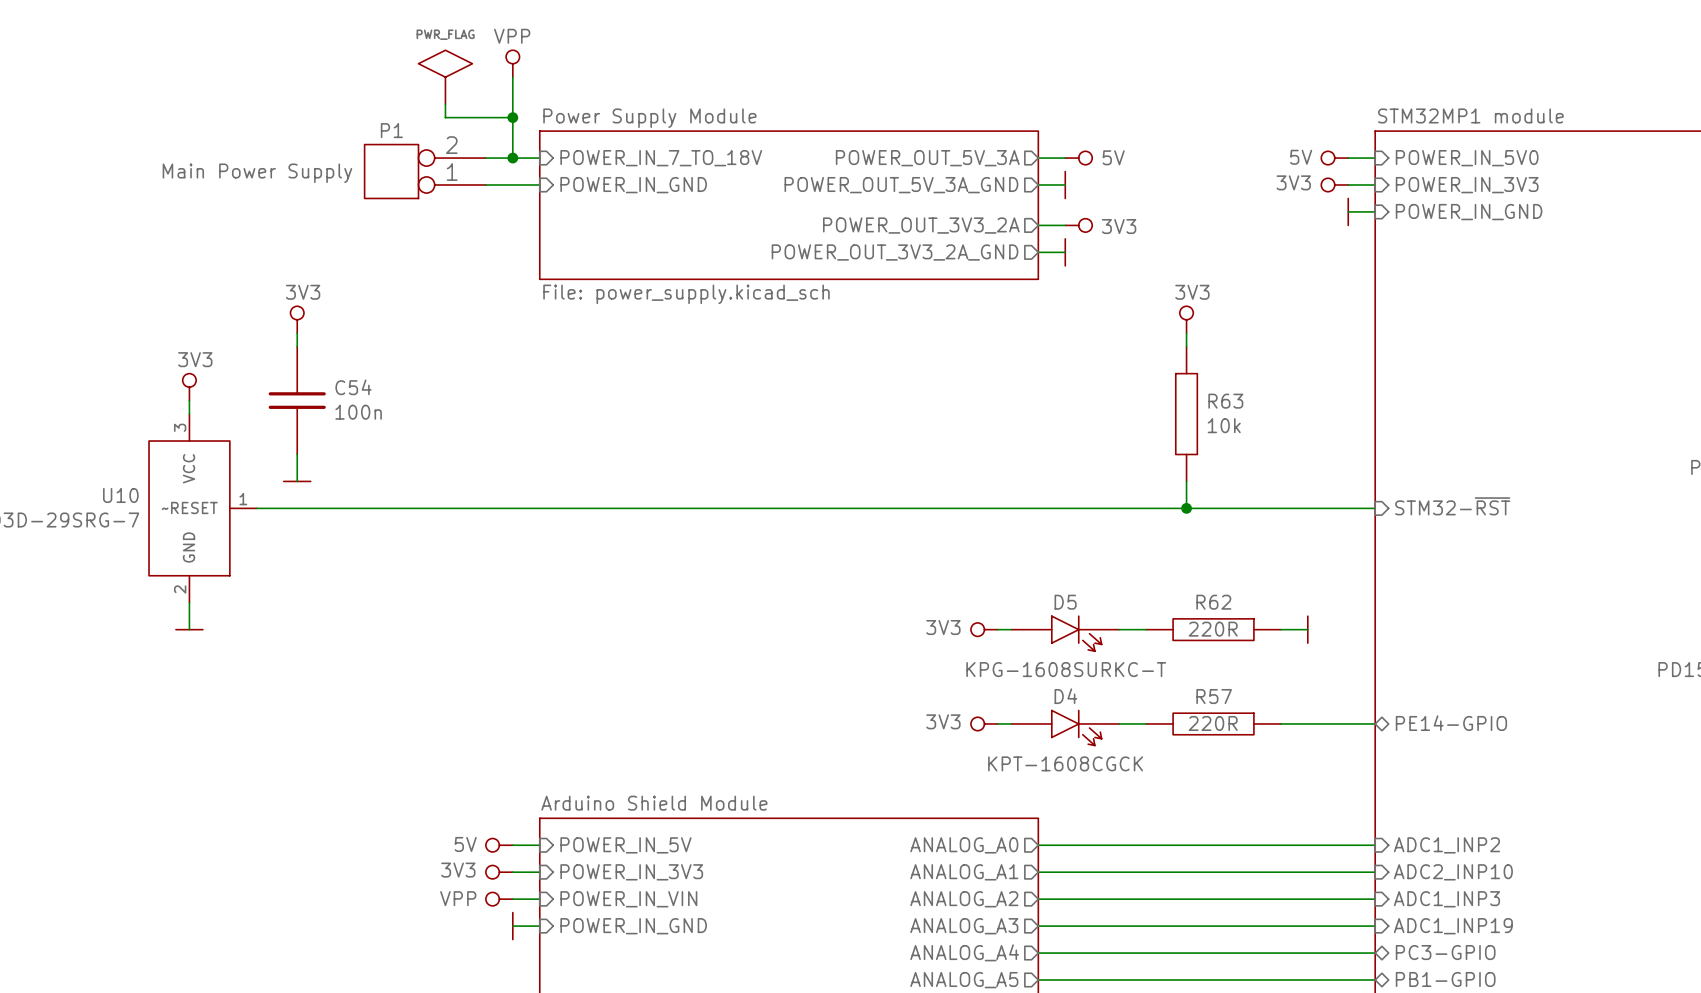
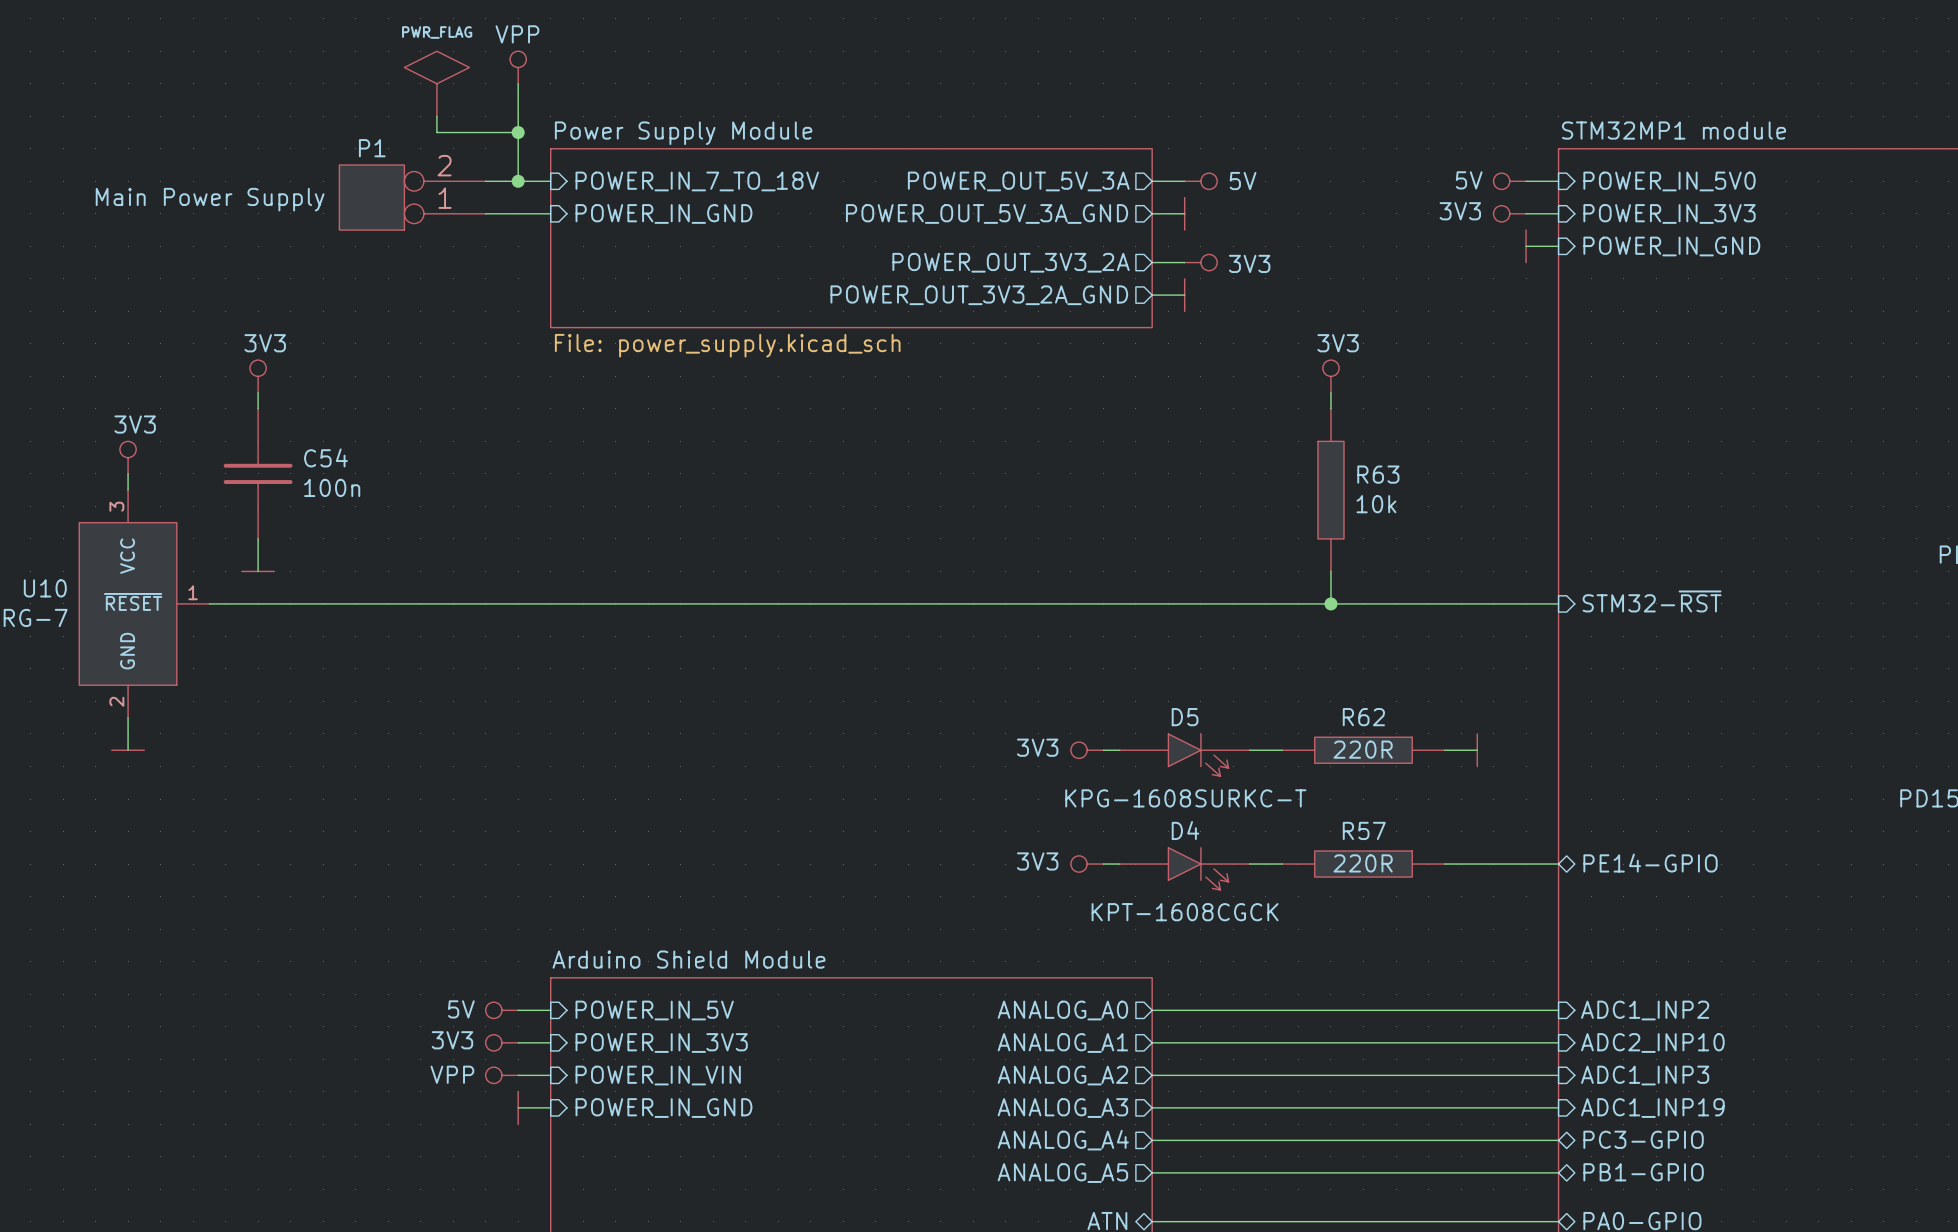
U10 pin name: ~RESET (189, 507) -> ~{RESET} (133, 601)

